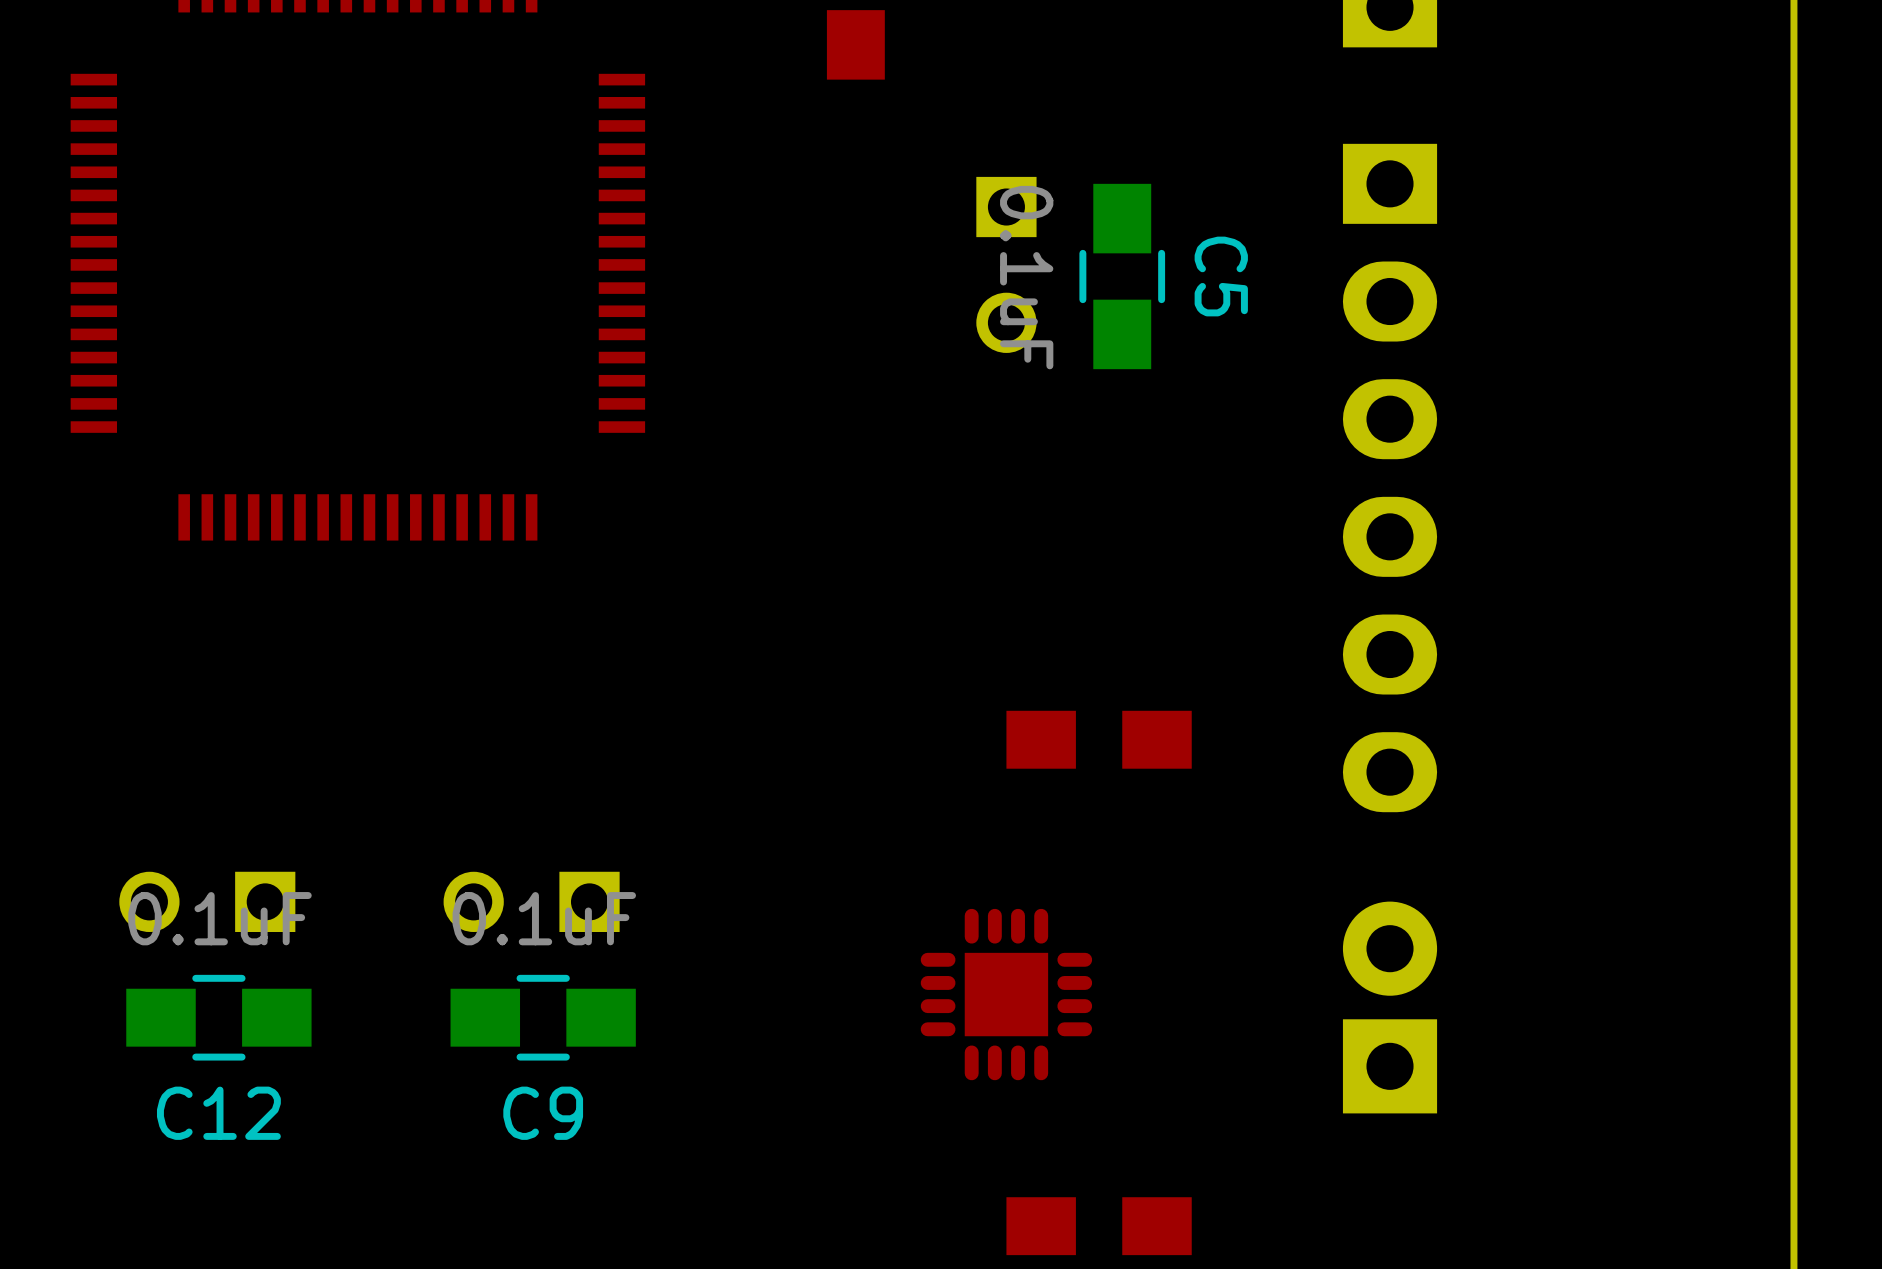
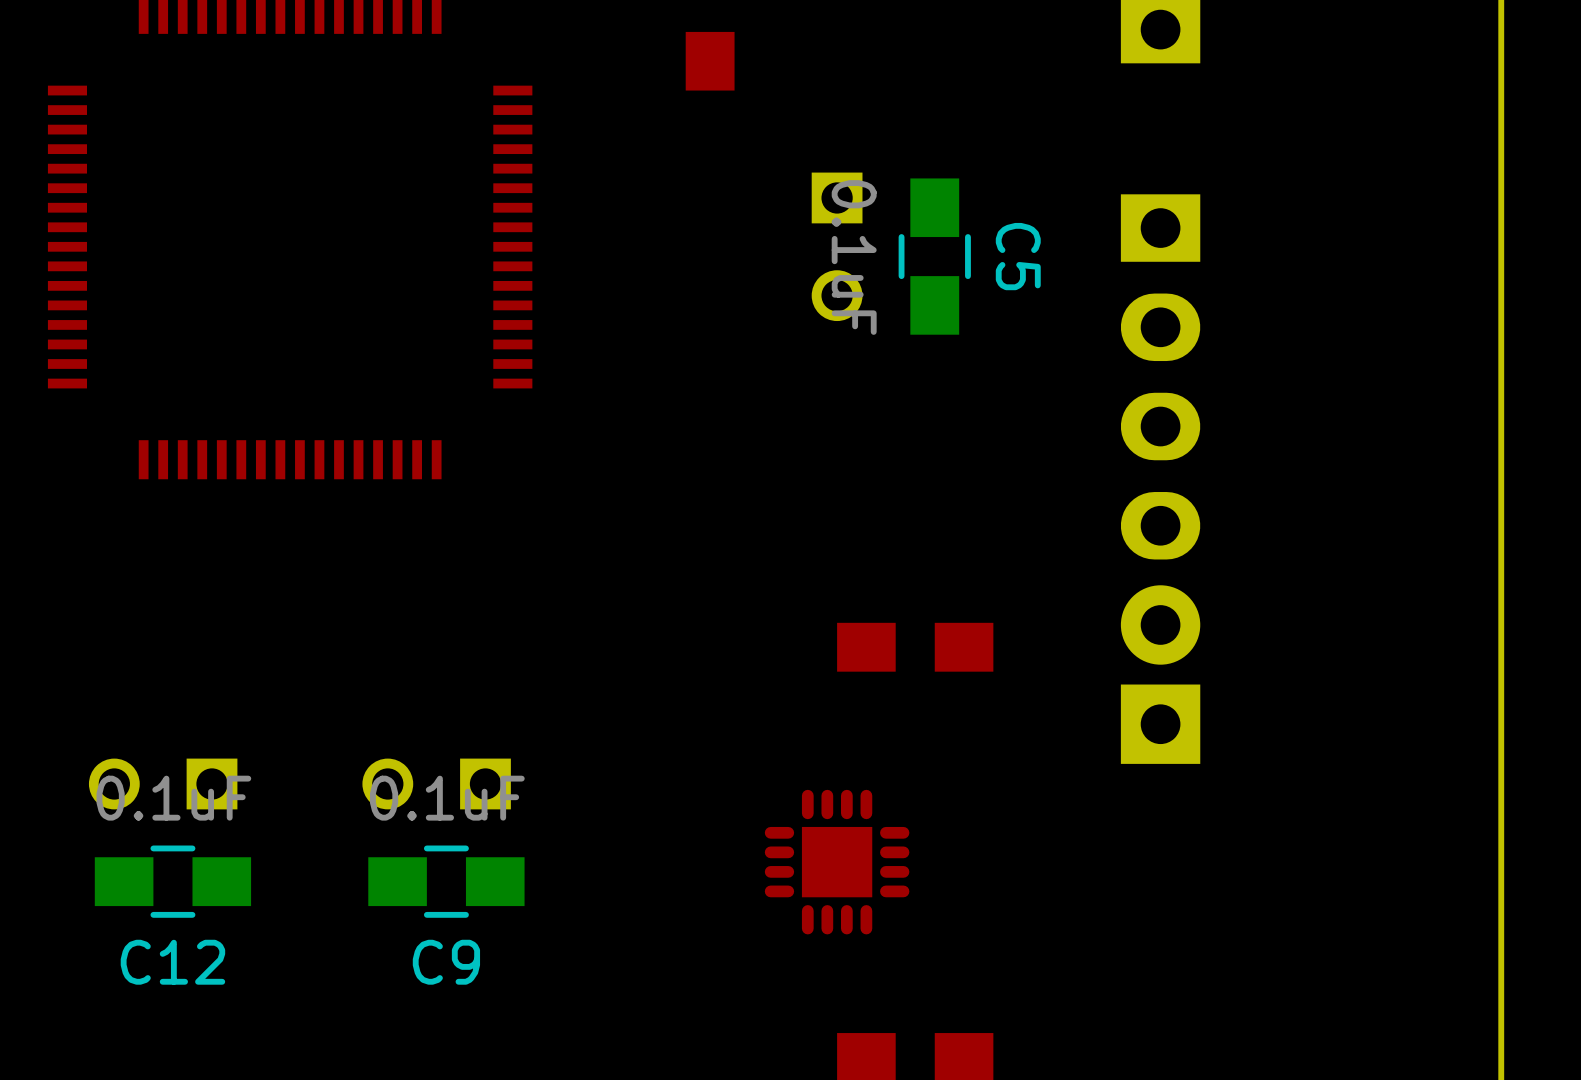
part: none -> (1160, 376)
part: (1390, 478) -> none
part position: (1390, 1007) -> (1160, 674)

